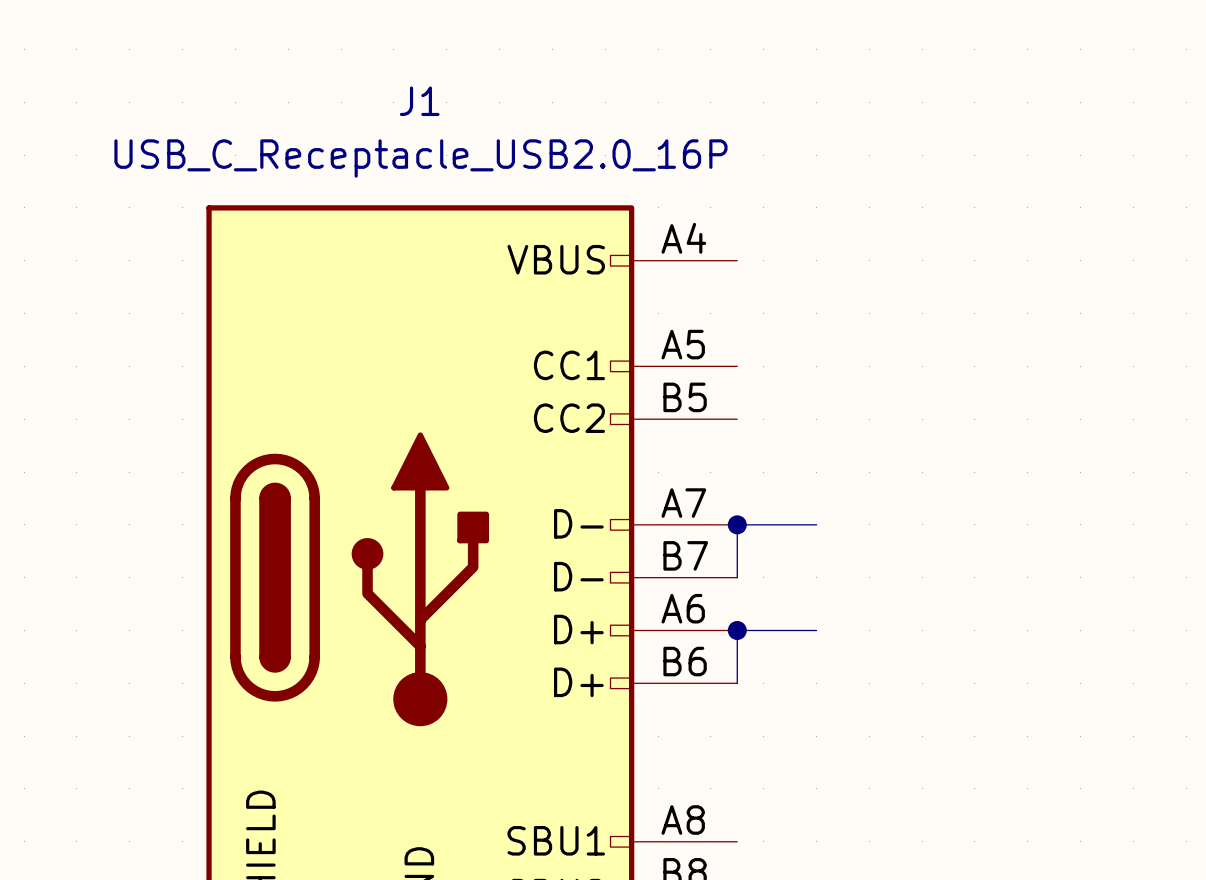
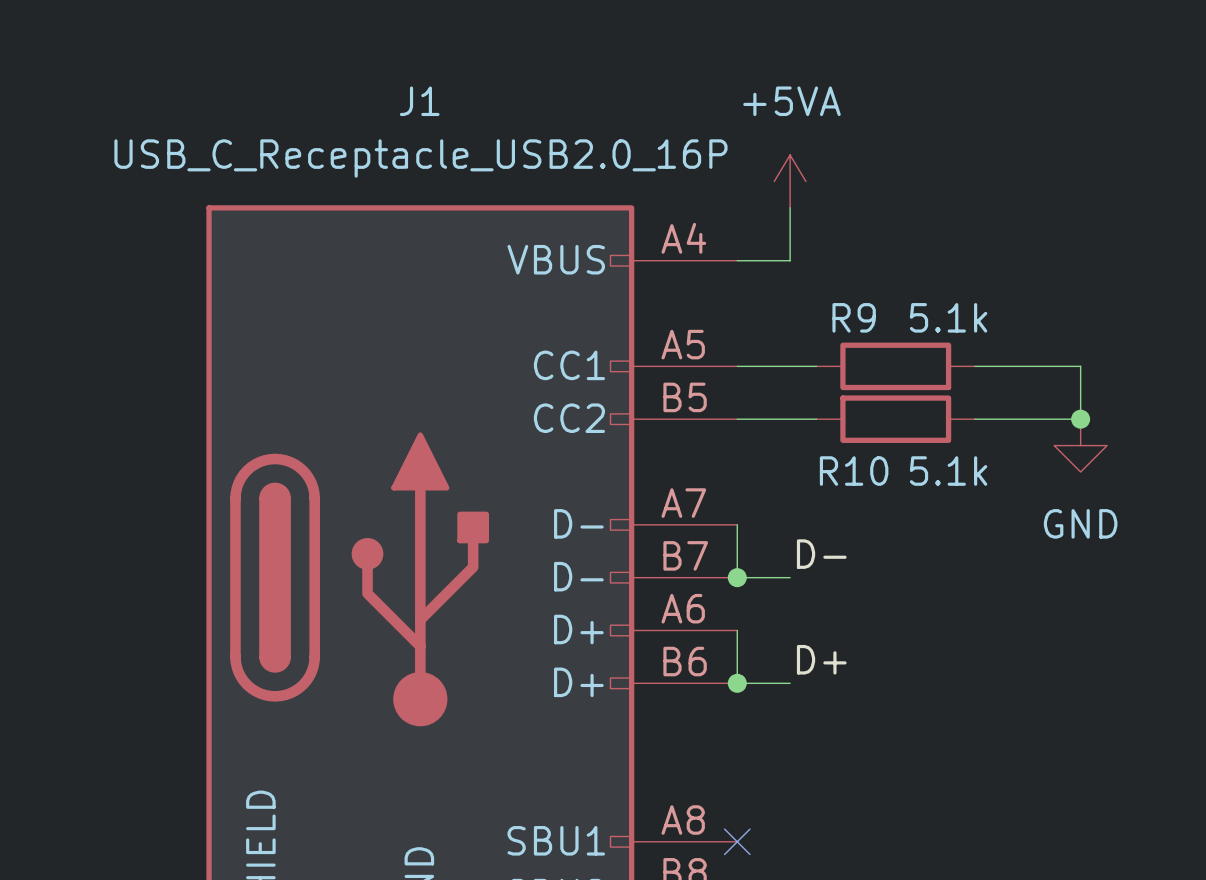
power symbol: none -> +5VA (790, 181)
wire: none -> (790, 207) (790, 260) (737, 260)
R9: none -> 5.1k (895, 366)
wire: none -> (974, 366) (1080, 366) (1080, 419) (974, 419)
R10: none -> 5.1k (895, 419)
junction: none -> (1080, 419)
power symbol: none -> GND (1080, 445)
wire: (737, 524) (816, 524) -> (737, 419) (816, 419)
junction: (737, 524) -> none
label: none -> D- (821, 554)
wire: none -> (737, 577) (790, 577)
junction: none -> (737, 577)
wire: (737, 630) (816, 630) -> (737, 366) (816, 366)
junction: (737, 630) -> none
label: none -> D+ (821, 659)
wire: none -> (737, 683) (790, 683)
junction: none -> (737, 683)
no-connect mark: none -> (737, 841)

